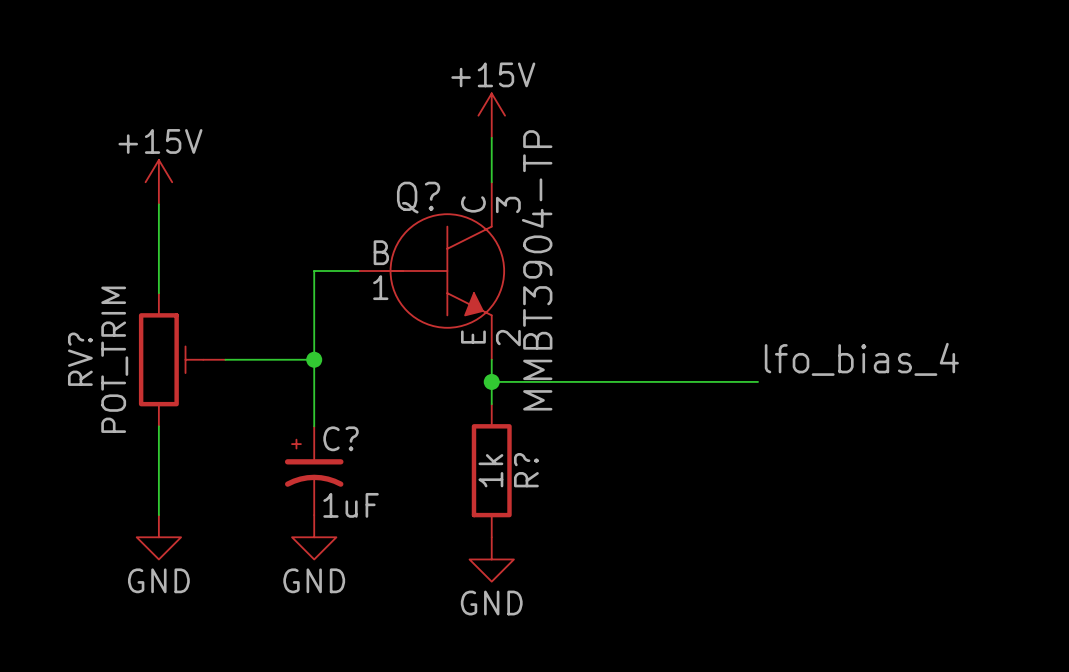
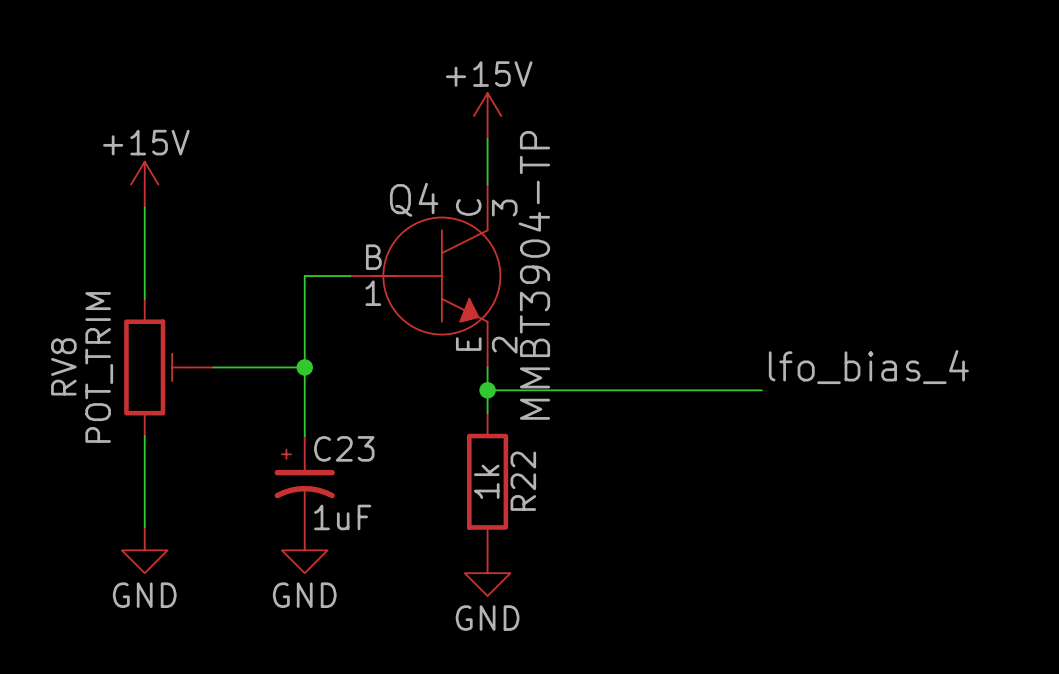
Q? name: Q? (418, 197) -> Q4 (414, 199)
RV? name: RV? (80, 359) -> RV8 (63, 366)
C? name: C? (341, 438) -> C23 (344, 448)
R? name: R? (526, 470) -> R22 (523, 481)

